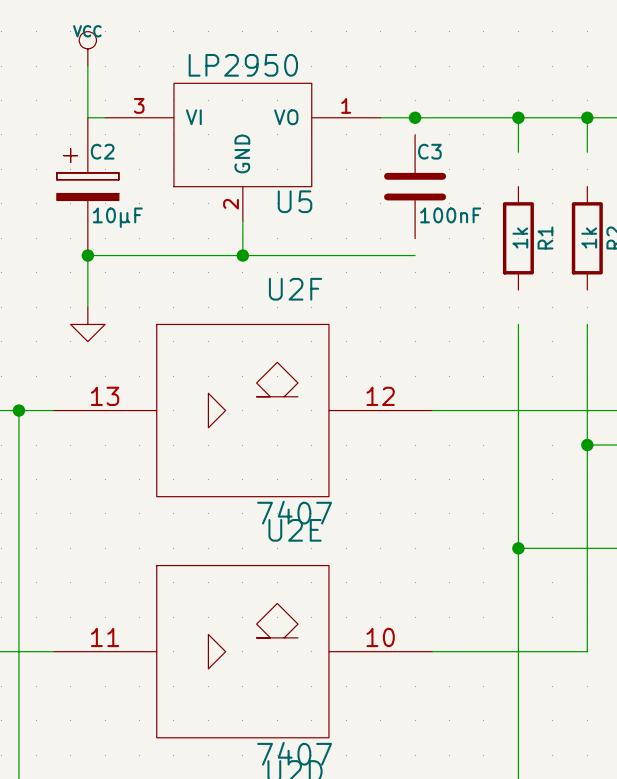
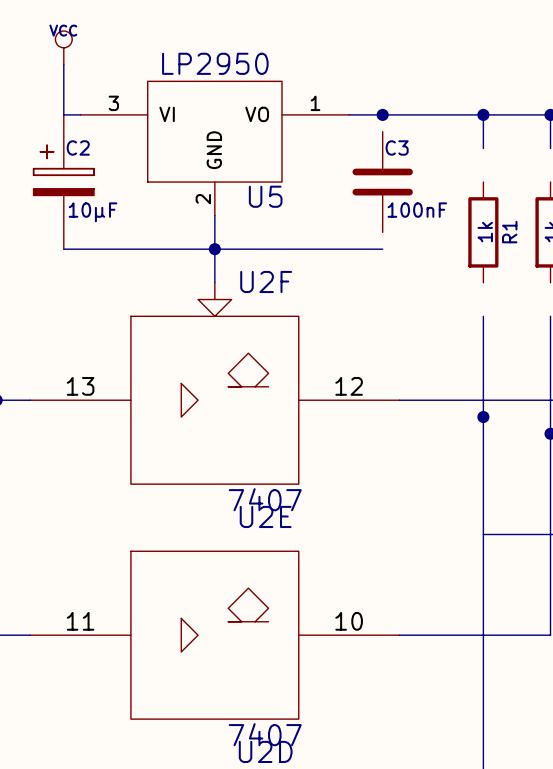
wire: (87, 255) (87, 307) -> none
junction: (87, 255) -> none
wire: none -> (214, 249) (214, 282)
power symbol position: (87, 324) -> (214, 299)
junction: none -> (483, 417)
junction: (518, 548) -> none

